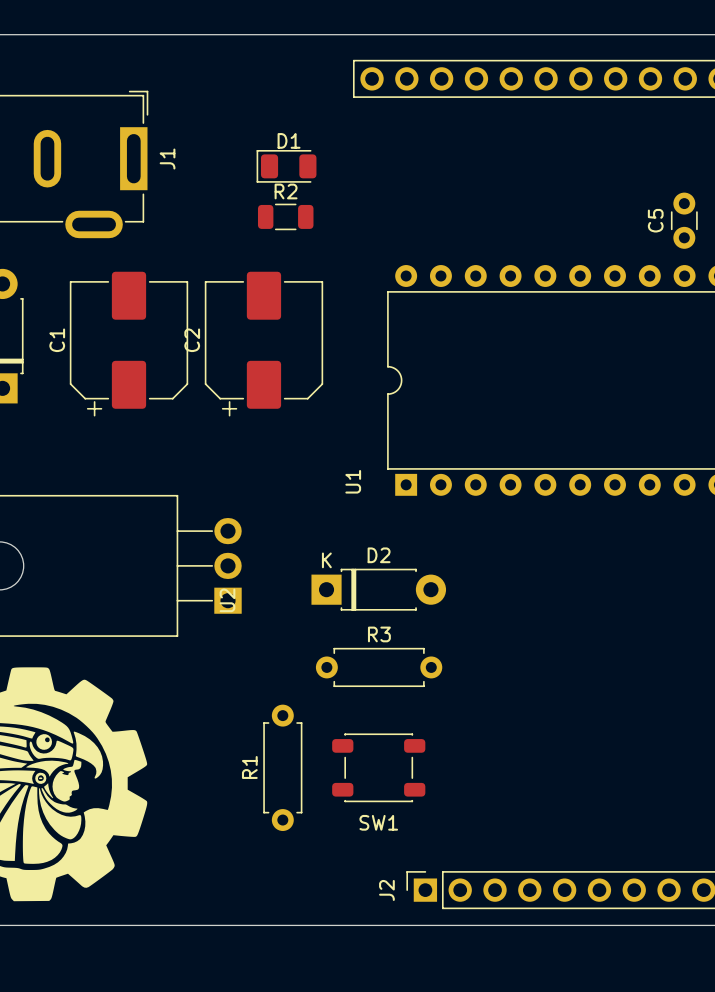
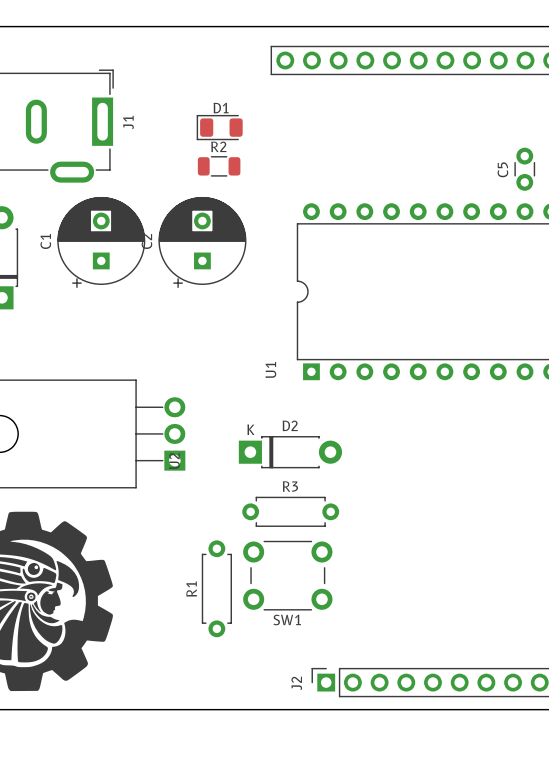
C1 footprint: [69, 271, 189, 417] -> [57, 197, 146, 288]
C2 footprint: [204, 271, 324, 417] -> [158, 197, 247, 288]
SW1 footprint: [332, 733, 426, 803] -> [243, 540, 333, 611]

